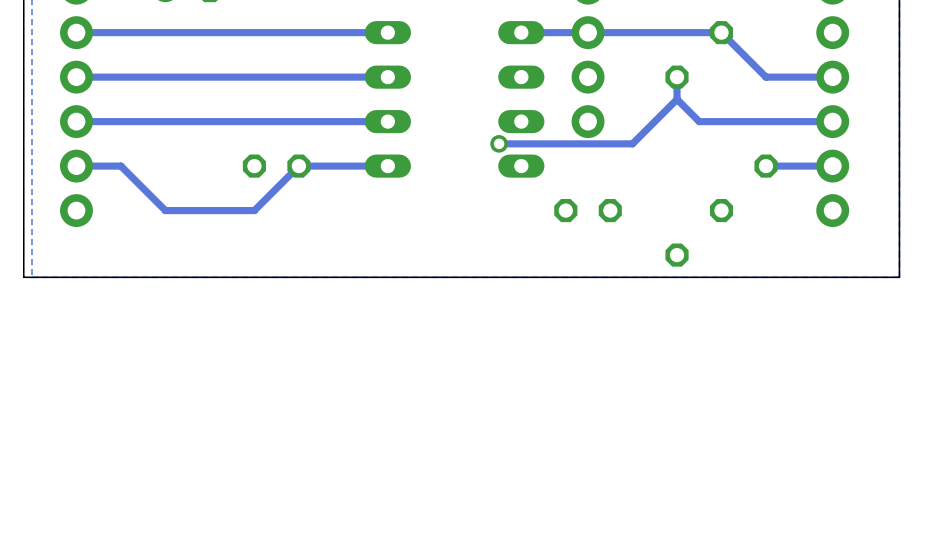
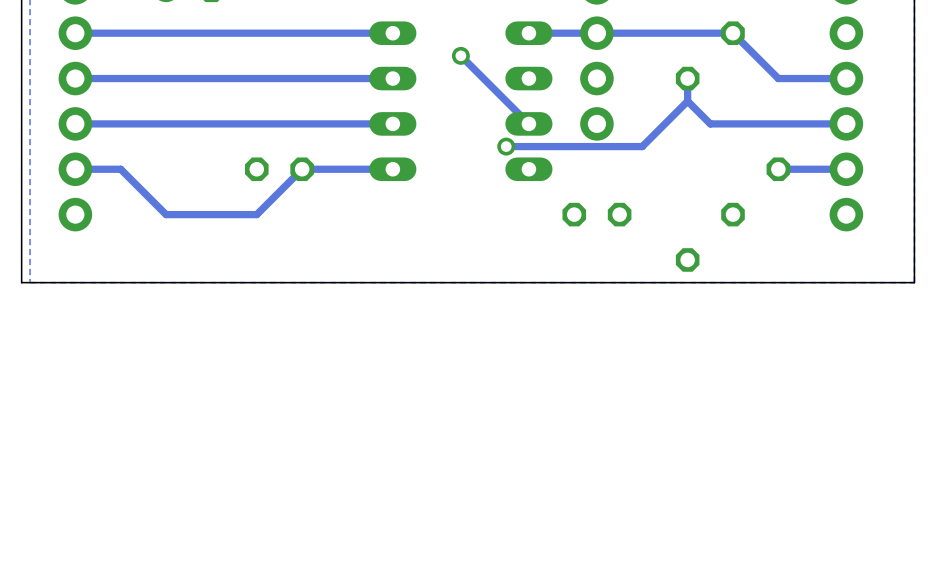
track: none -> (460, 55) (528, 123)
via: none -> (460, 55)

